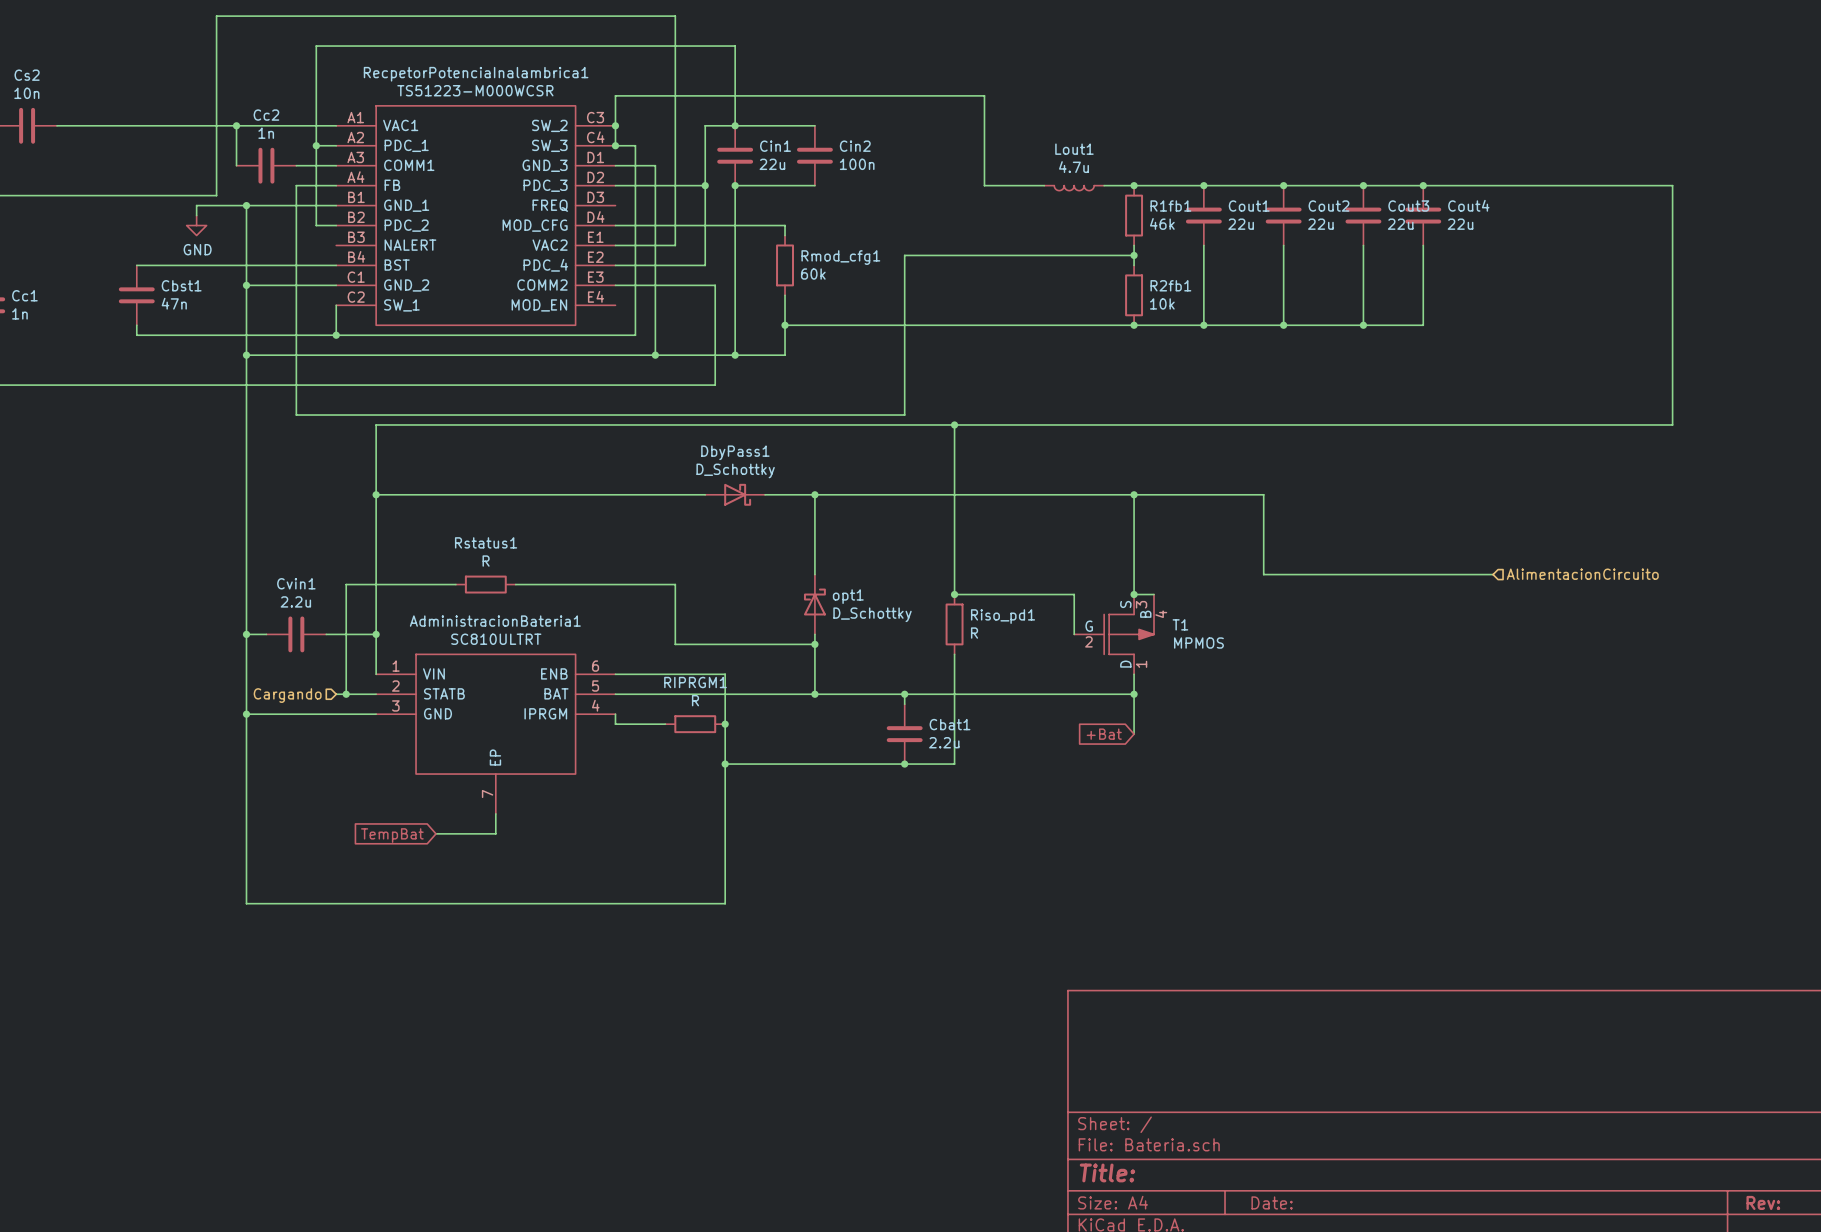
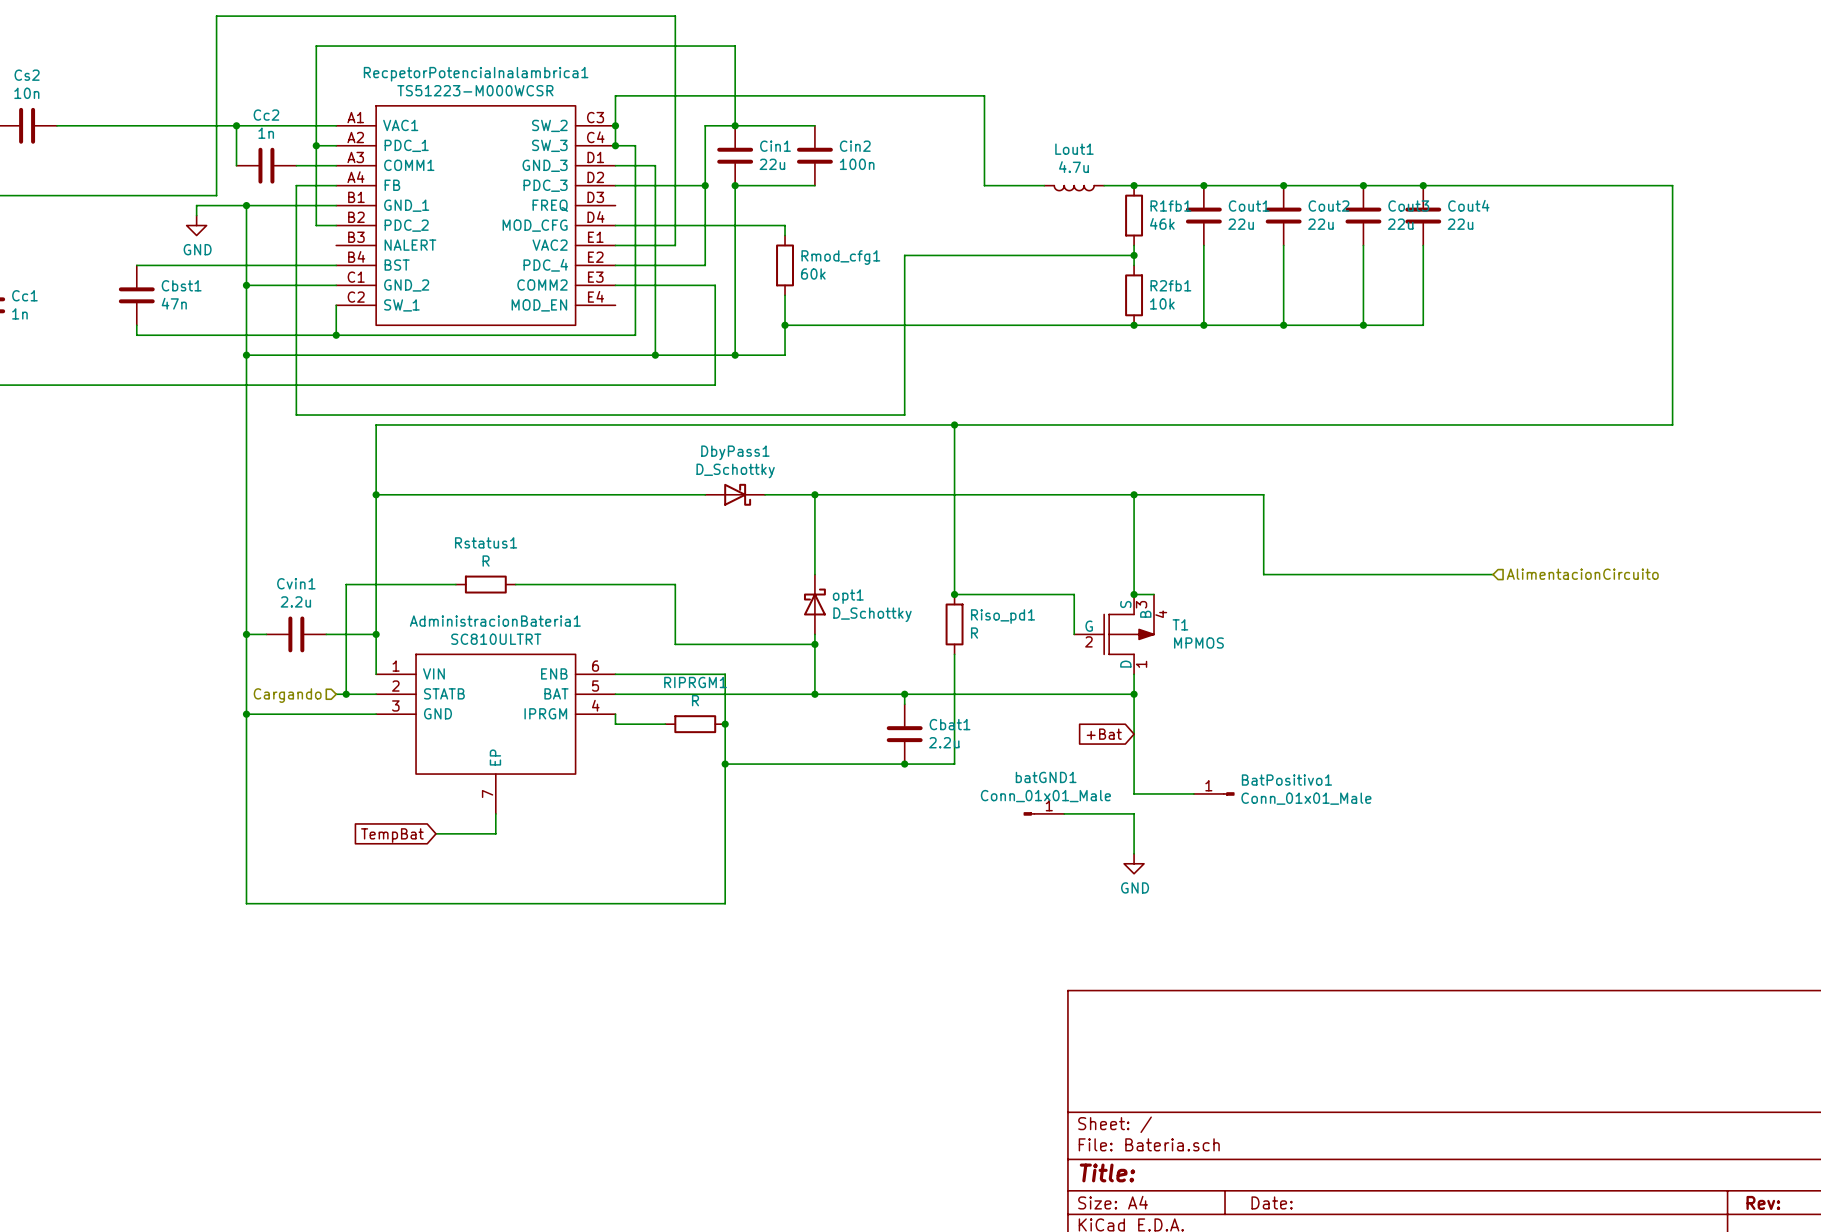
wire: none -> (1134, 734) (1134, 793) (1193, 793)
BatPositivo1: none -> Conn_01x01_Male (1214, 793)
batGND1: none -> Conn_01x01_Male (1044, 813)
wire: none -> (1064, 813) (1134, 813) (1134, 853)
power symbol: none -> GND (1134, 863)

